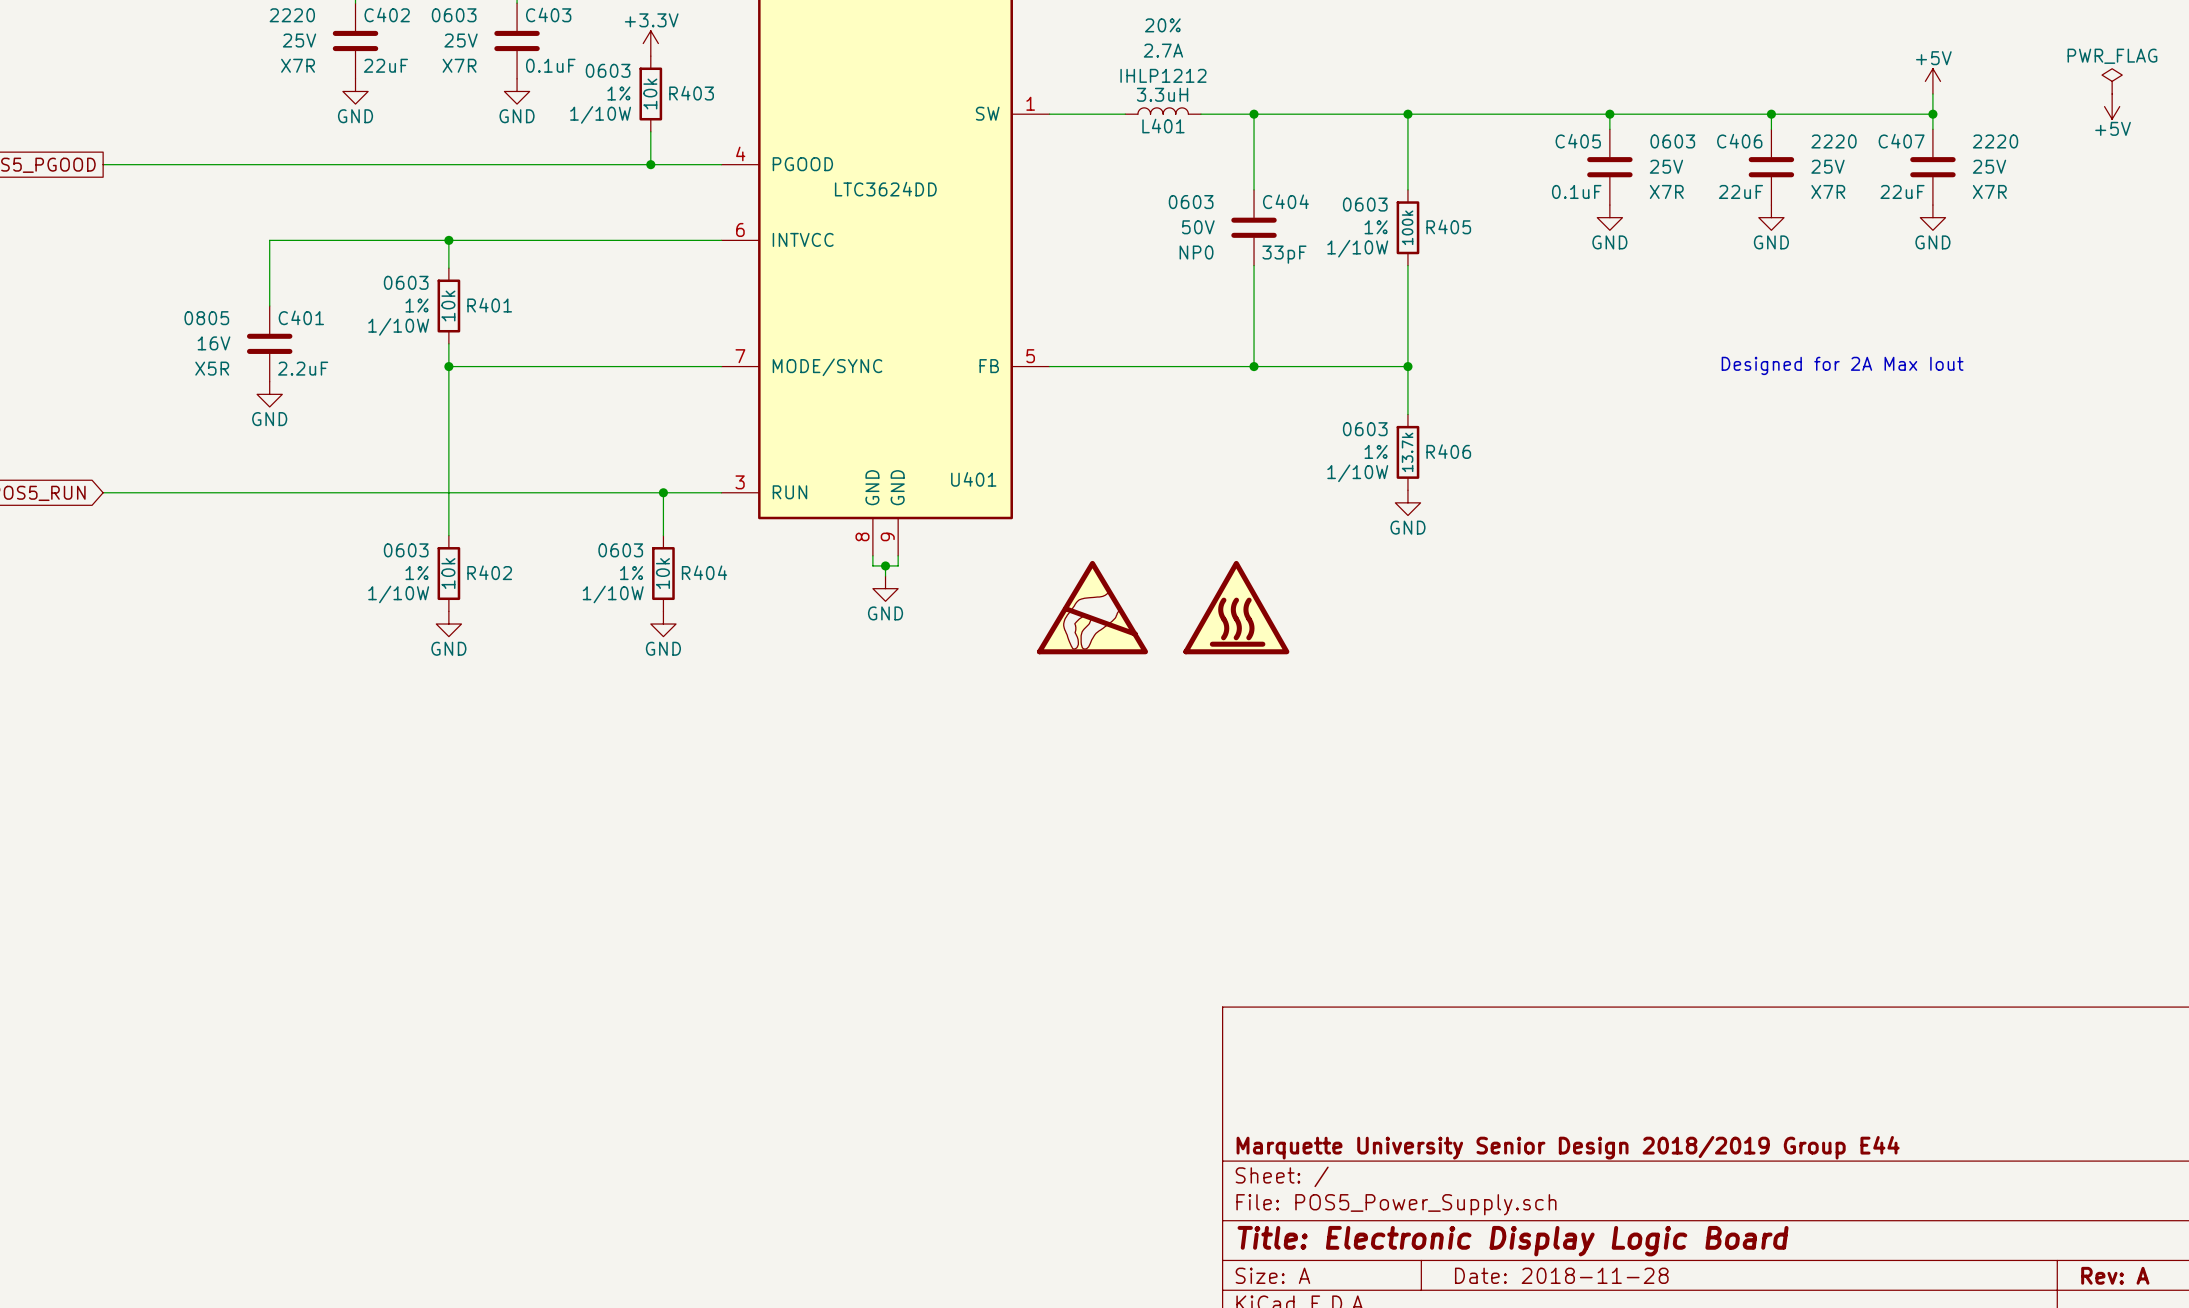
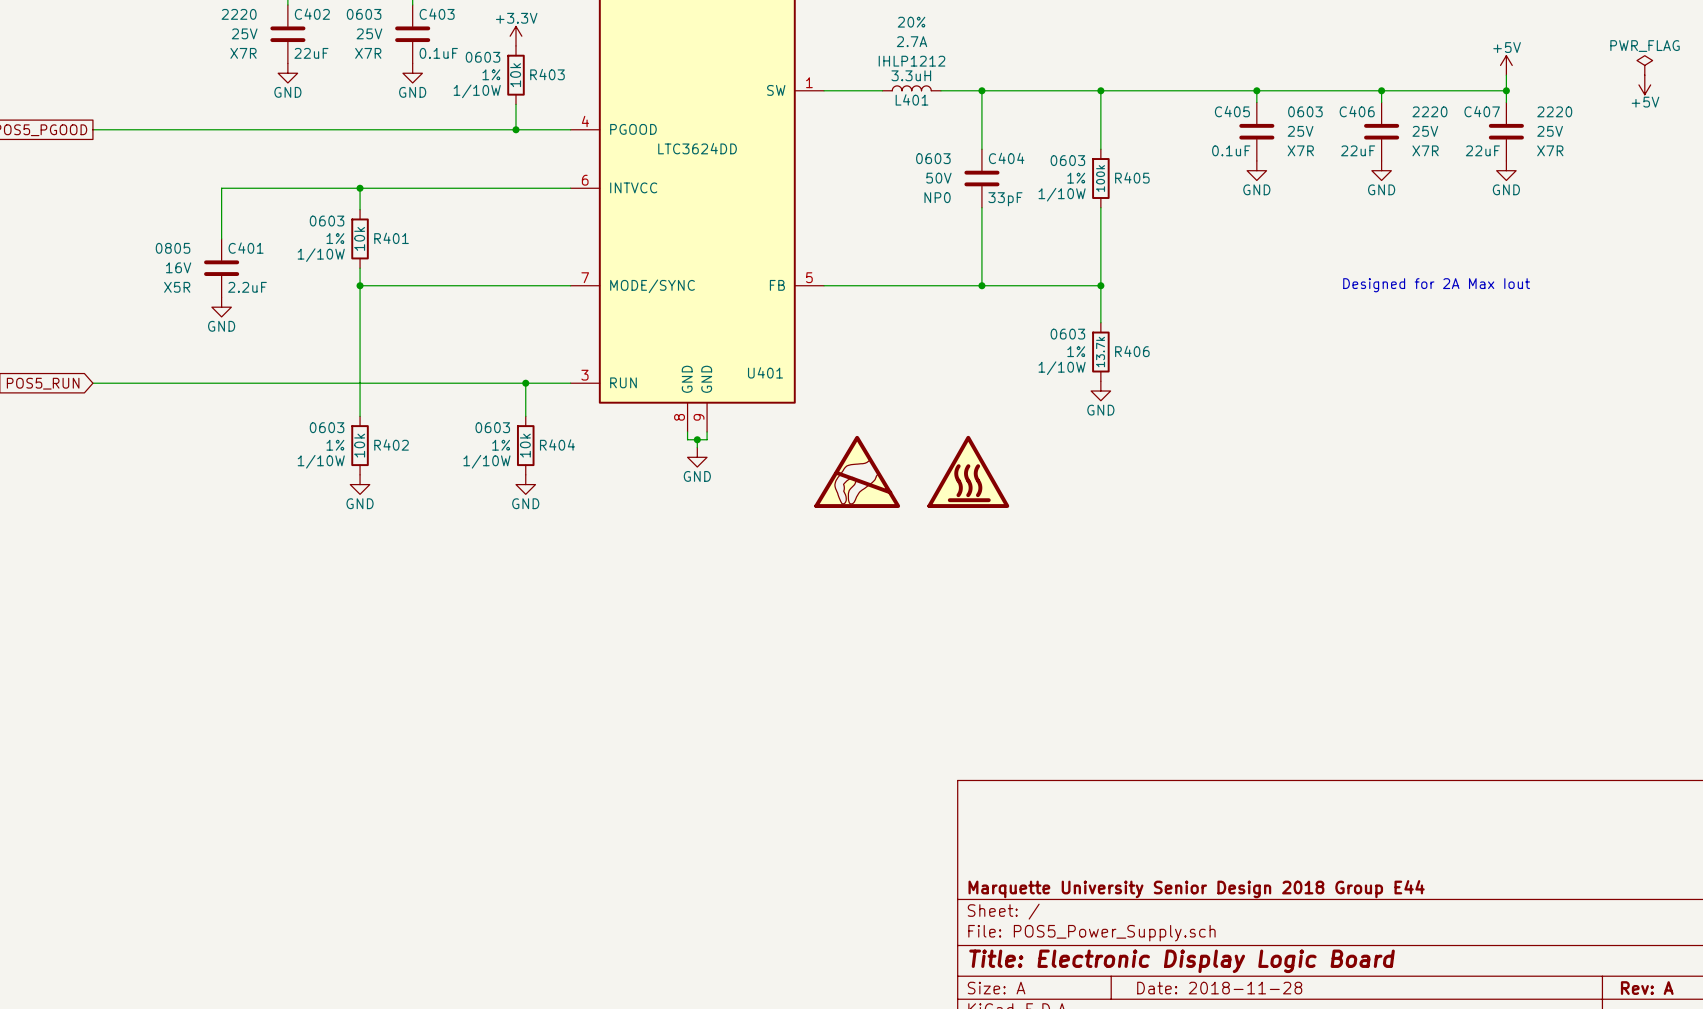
title block: Marquette University Senior Design 2018/2019 Group E44 (1568, 1147) -> Marquette University Senior Design 2018 Group E44 (1196, 889)

